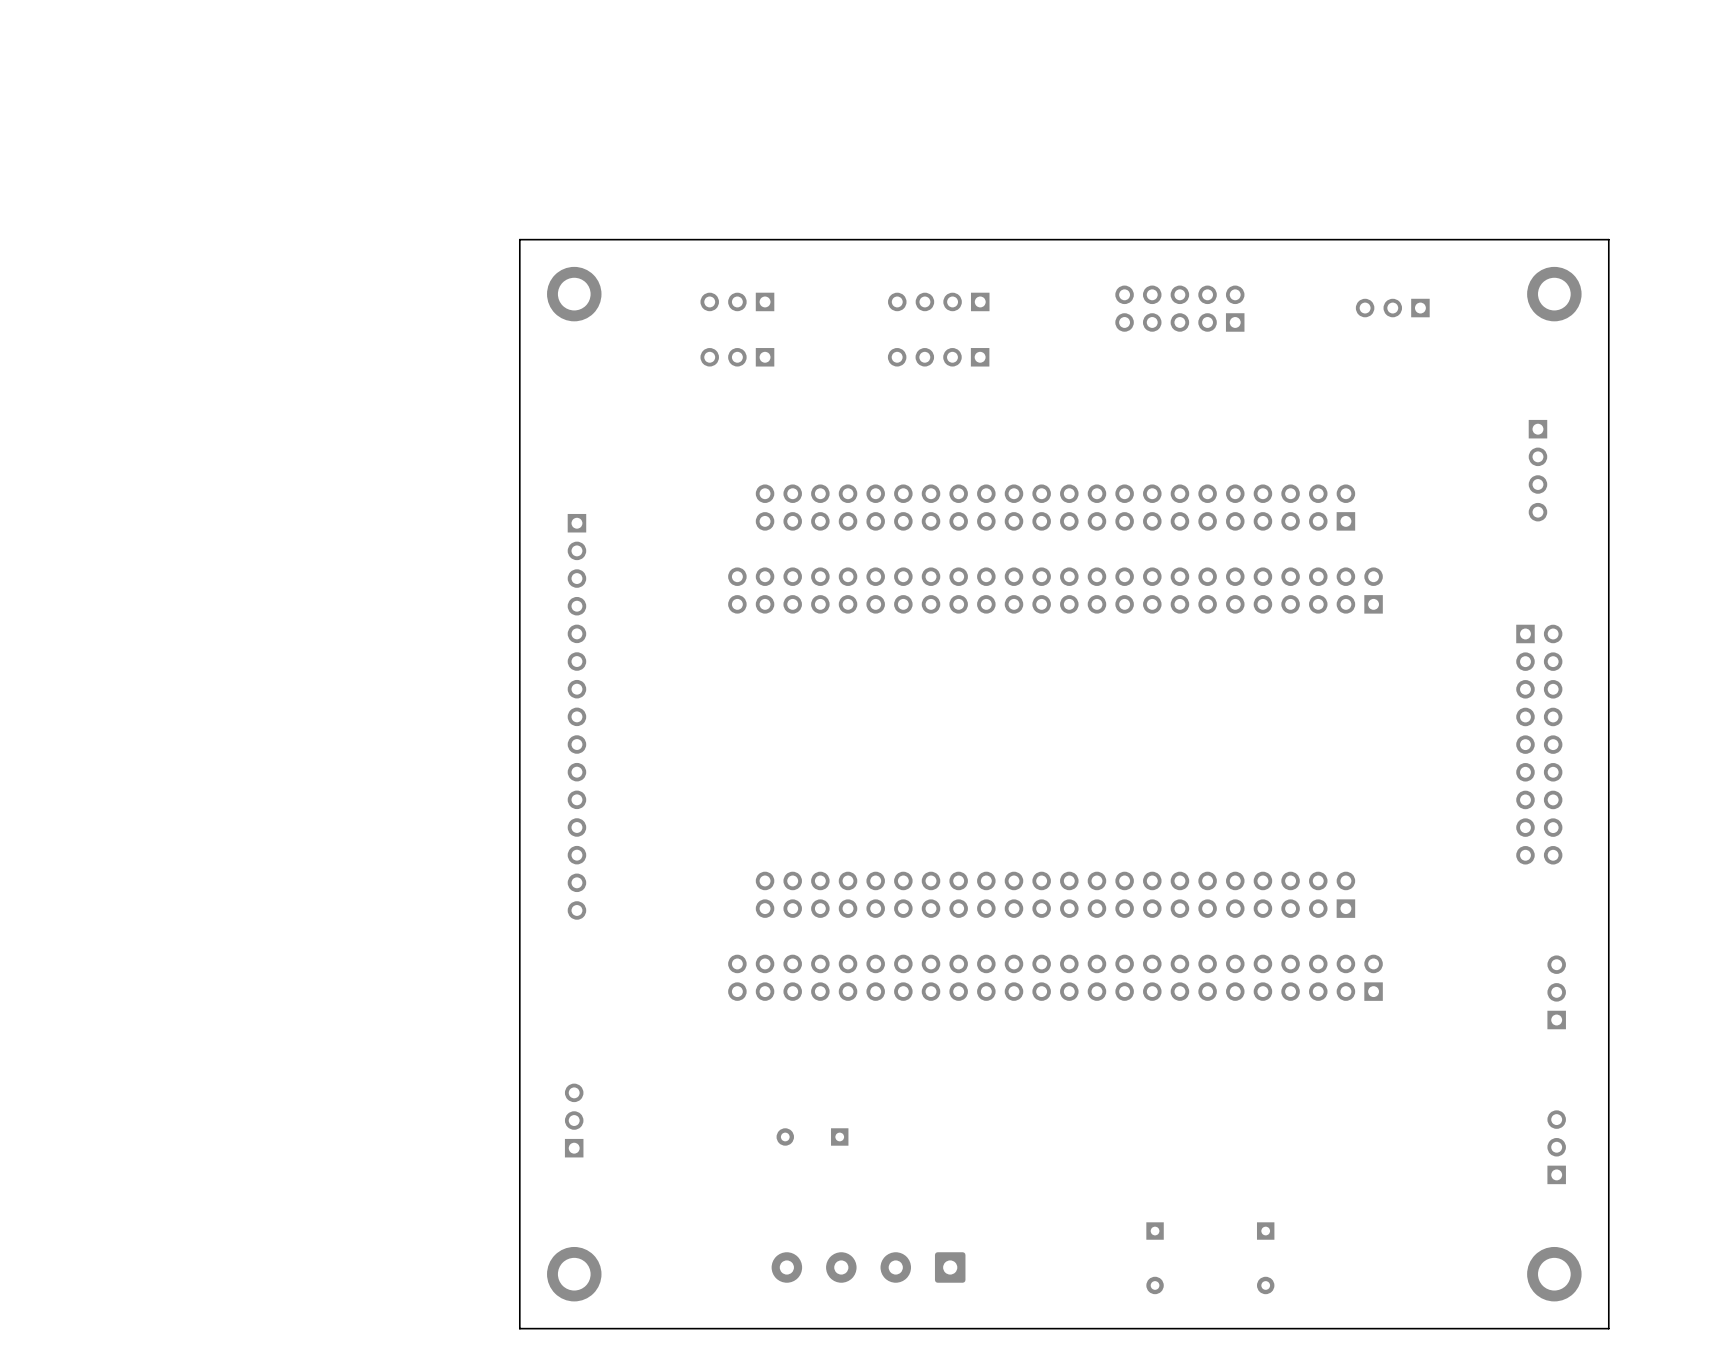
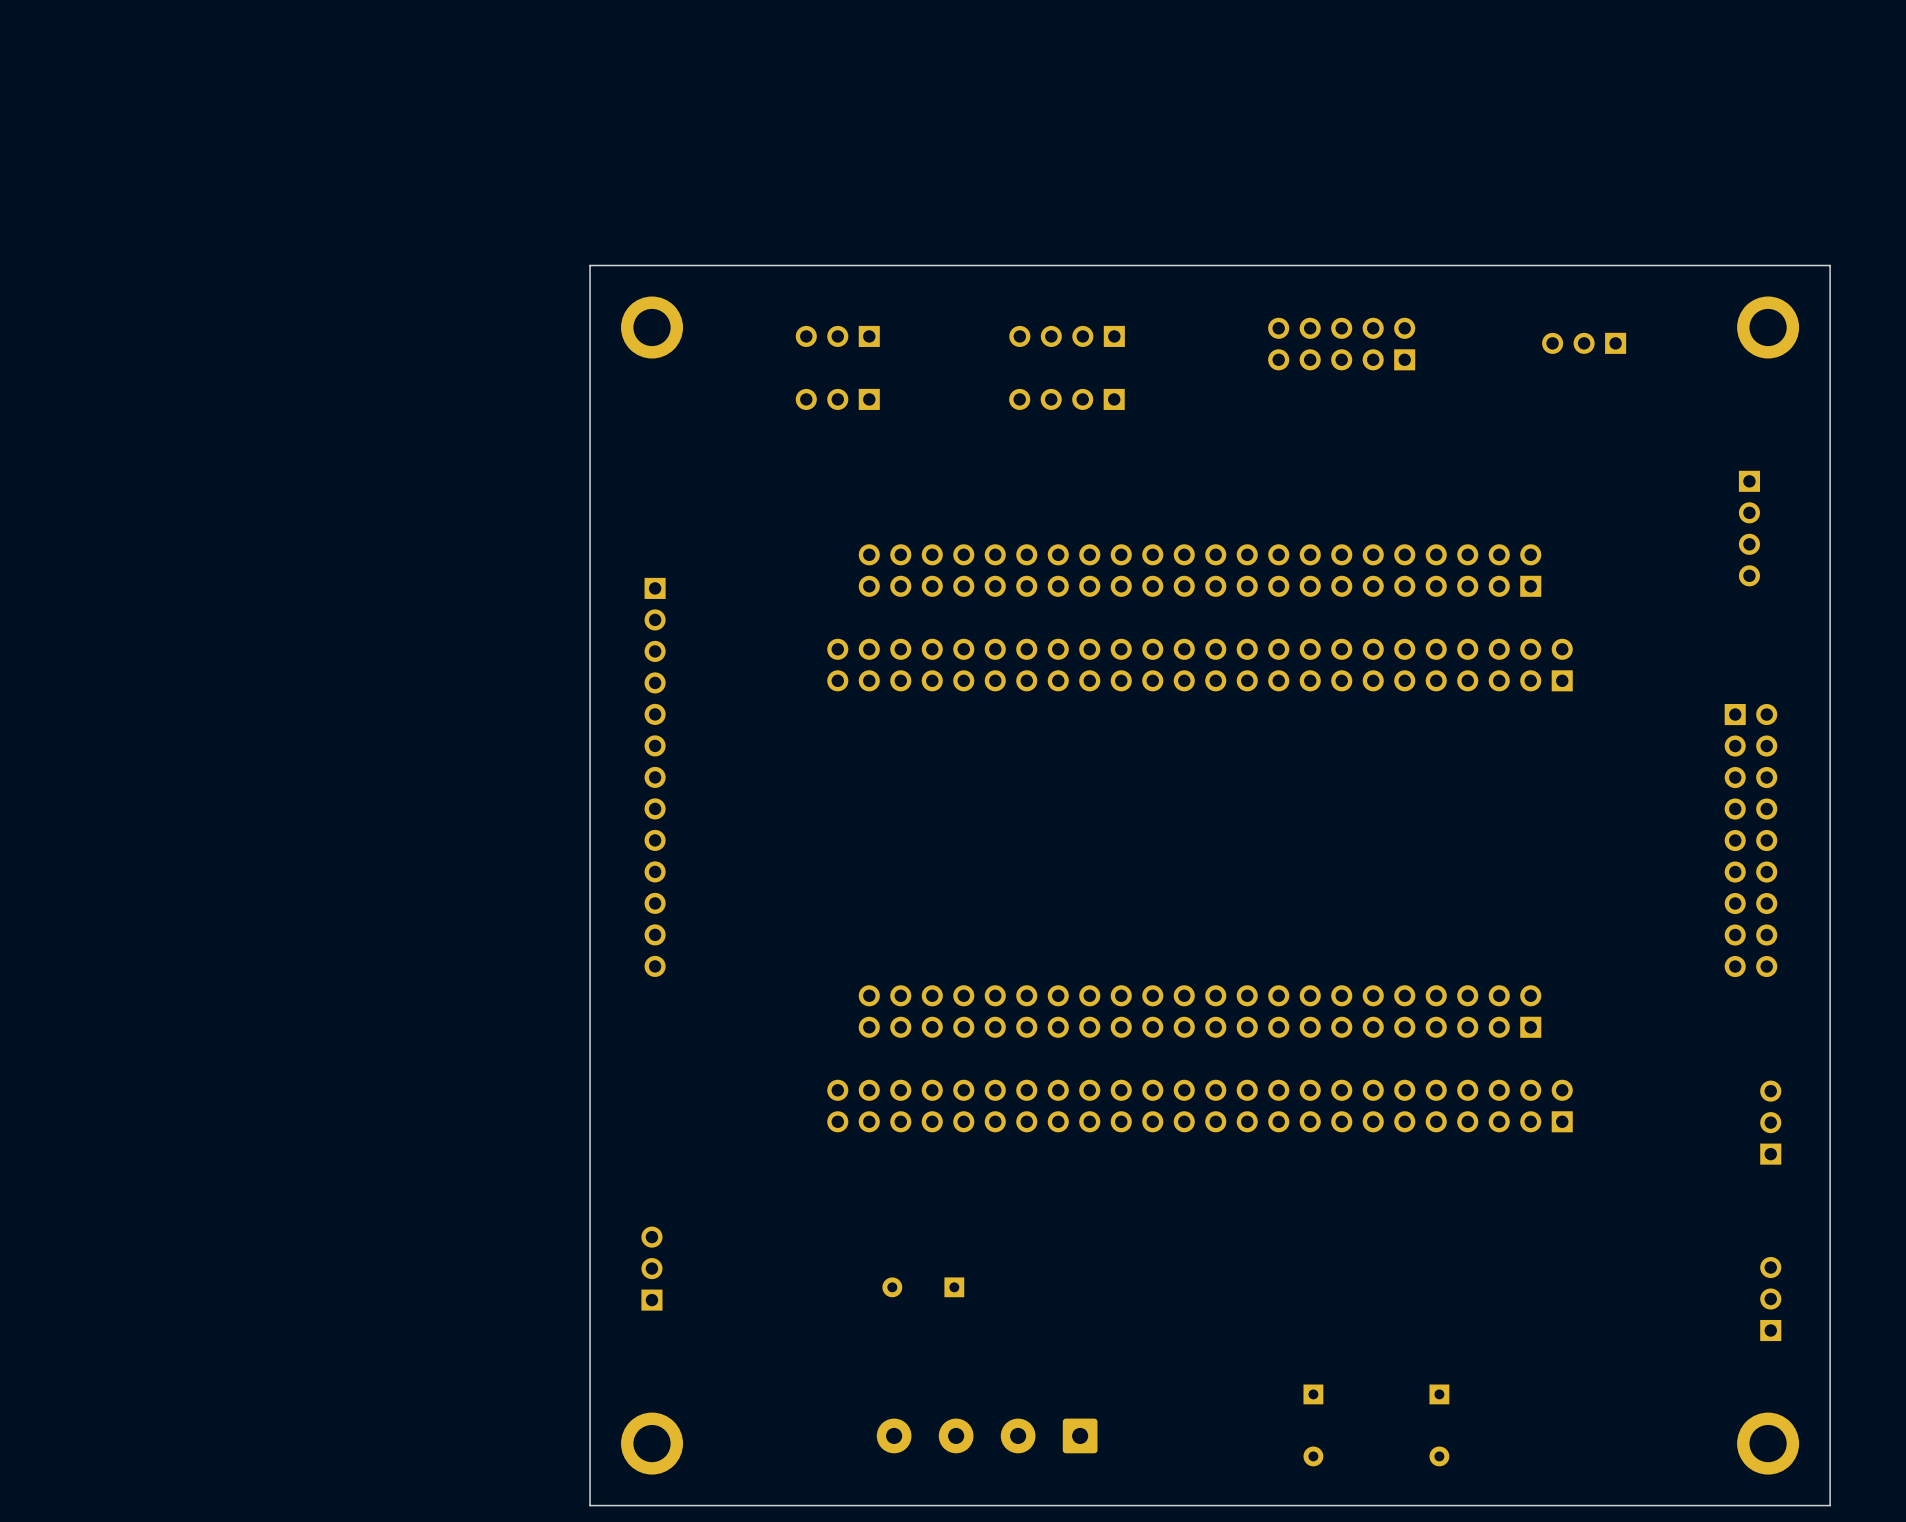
part: (576, 716) -> none

